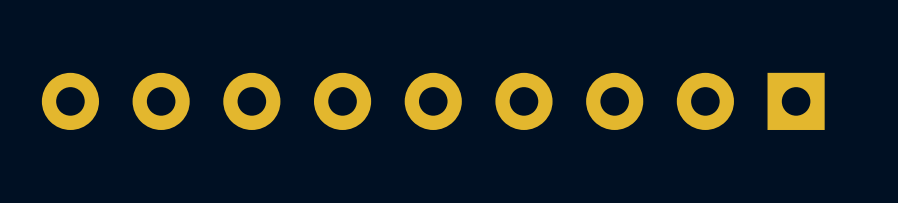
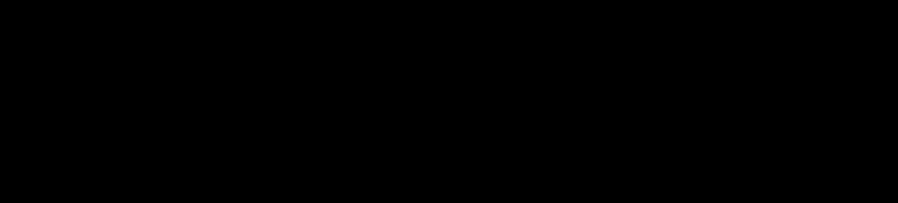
part: (433, 101) -> none

